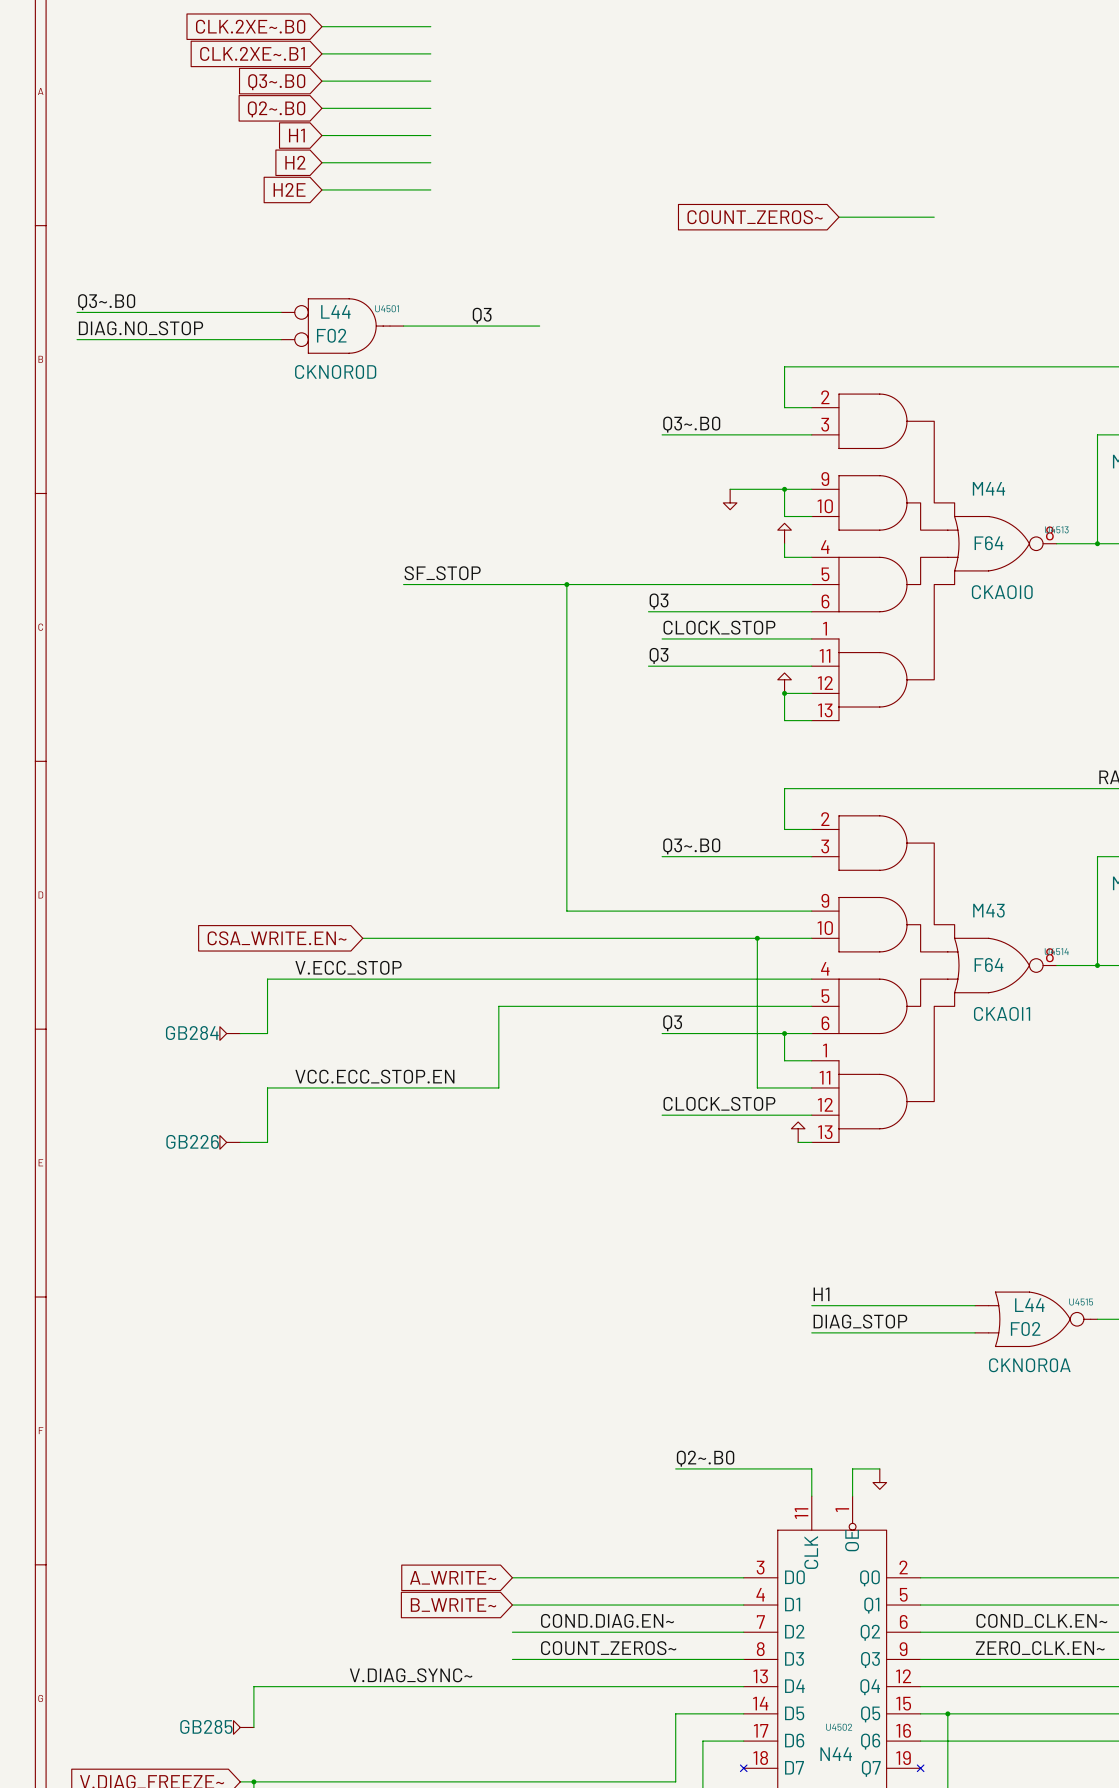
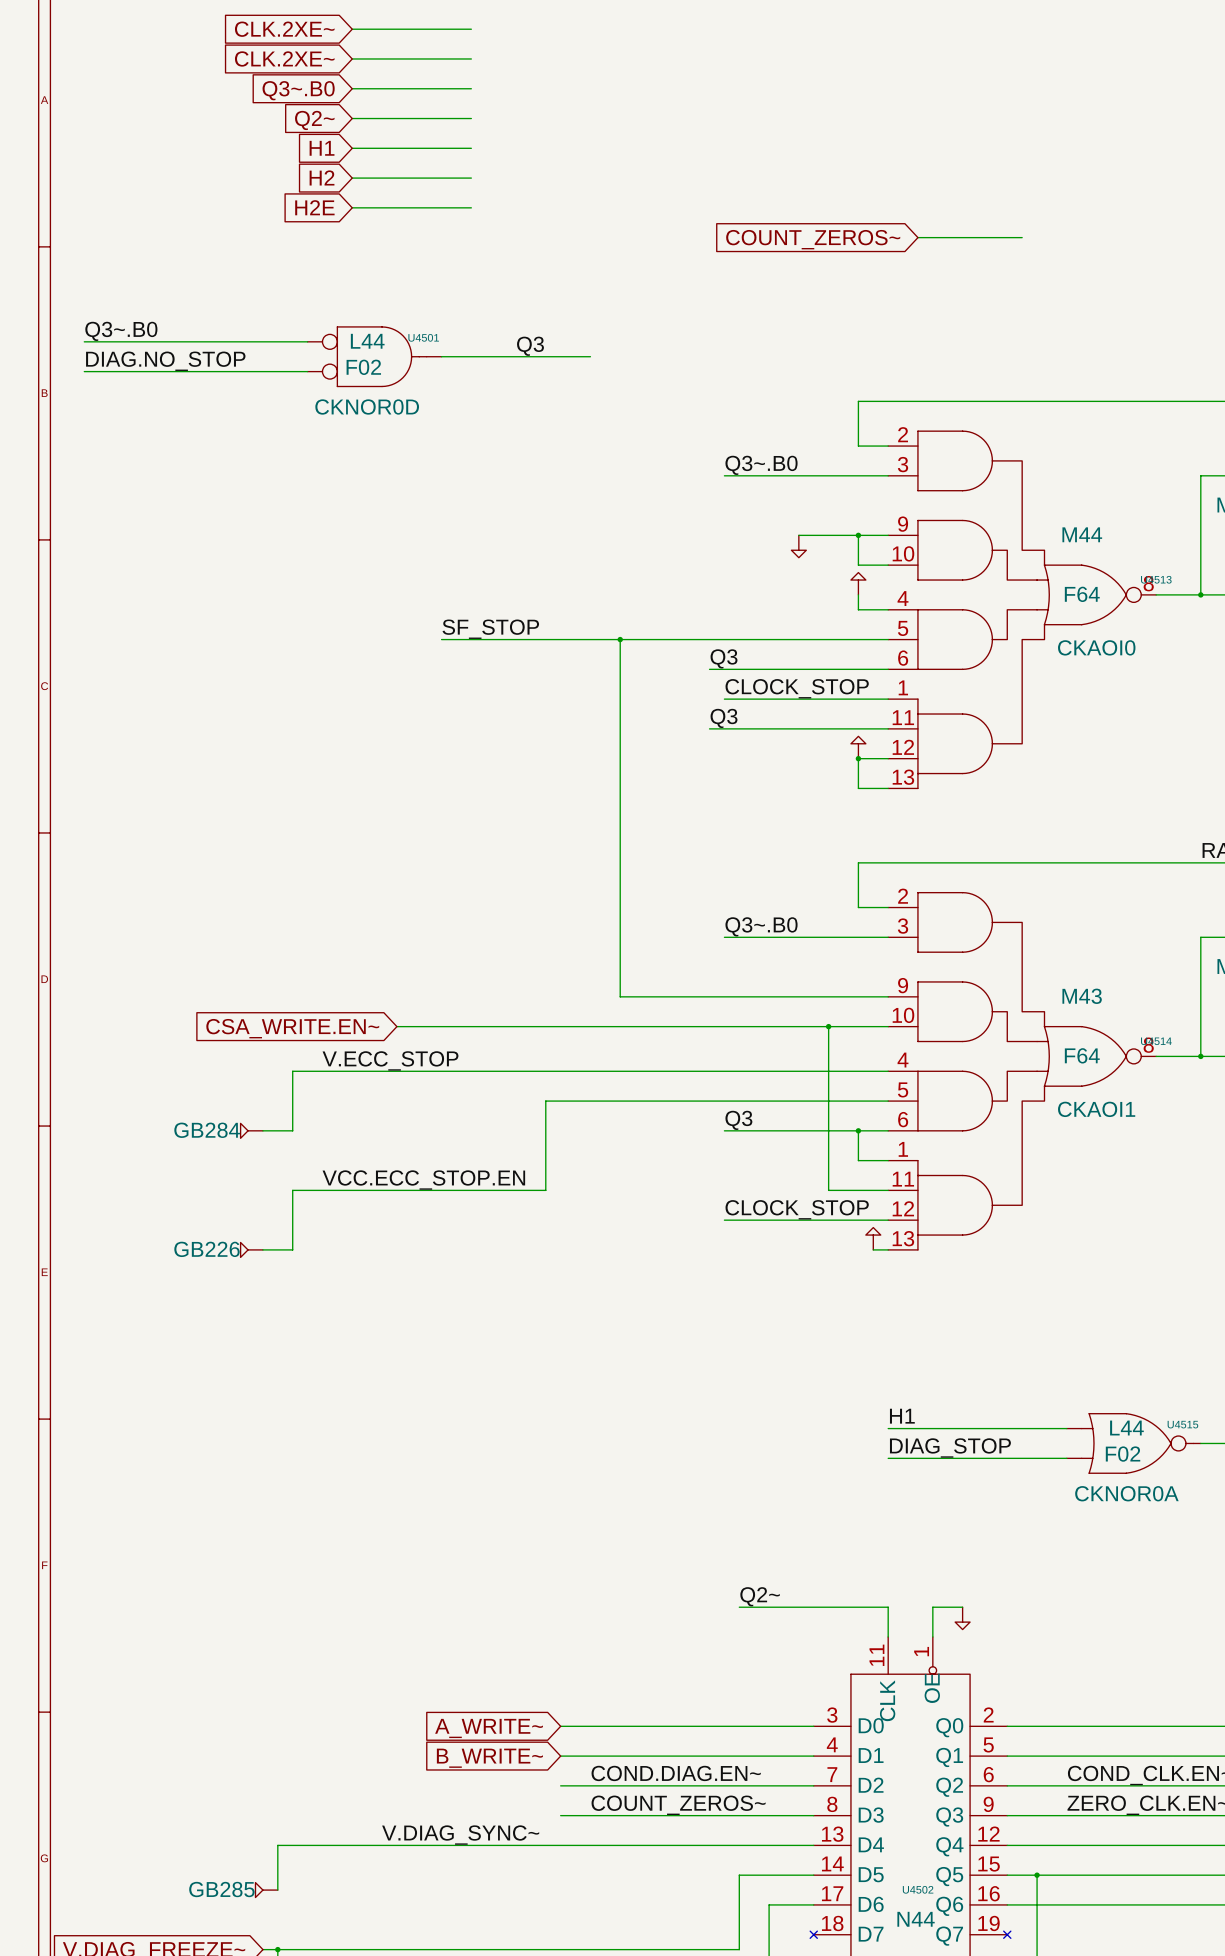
global label: CLK.2XE~.B0 (250, 26) -> CLK.2XE~ (284, 29)
global label: CLK.2XE~.B1 (252, 53) -> CLK.2XE~ (284, 58)
global label: Q2~.B0 (276, 109) -> Q2~ (314, 120)
label: Q2~.B0 (705, 1458) -> Q2~ (760, 1596)

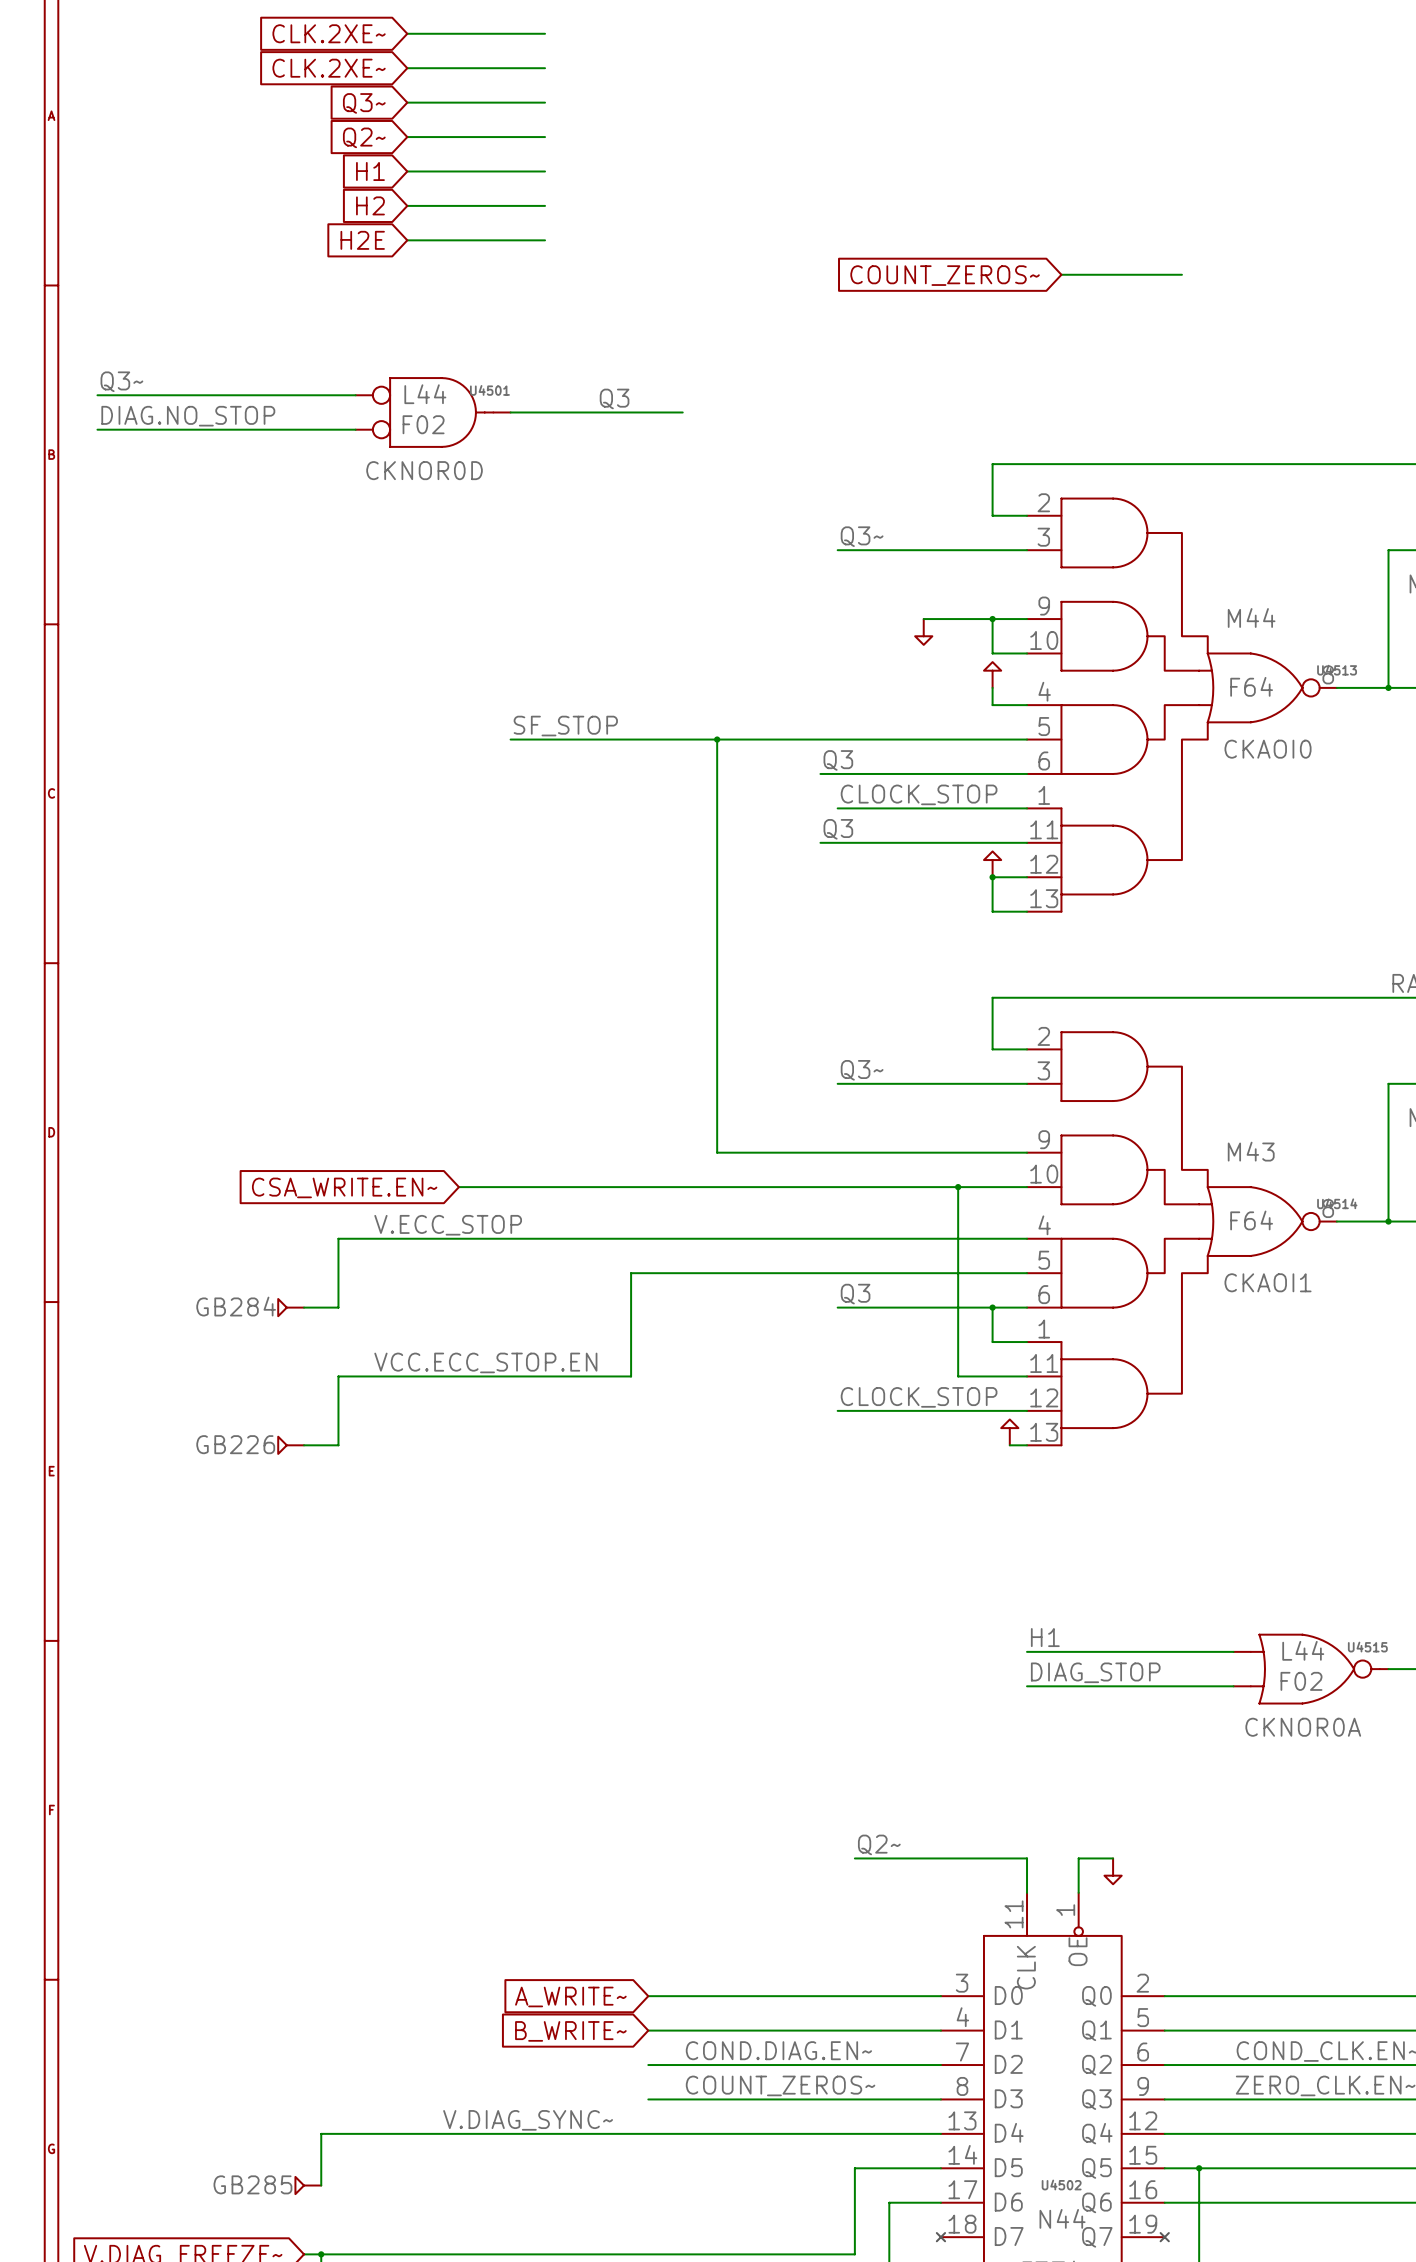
global label: Q3~.B0 (298, 90) -> Q3~ (364, 103)
label: Q3~.B0 (121, 331) -> Q3~ (121, 381)
label: Q3~.B0 (761, 465) -> Q3~ (862, 536)
label: Q3~.B0 (761, 926) -> Q3~ (862, 1070)

